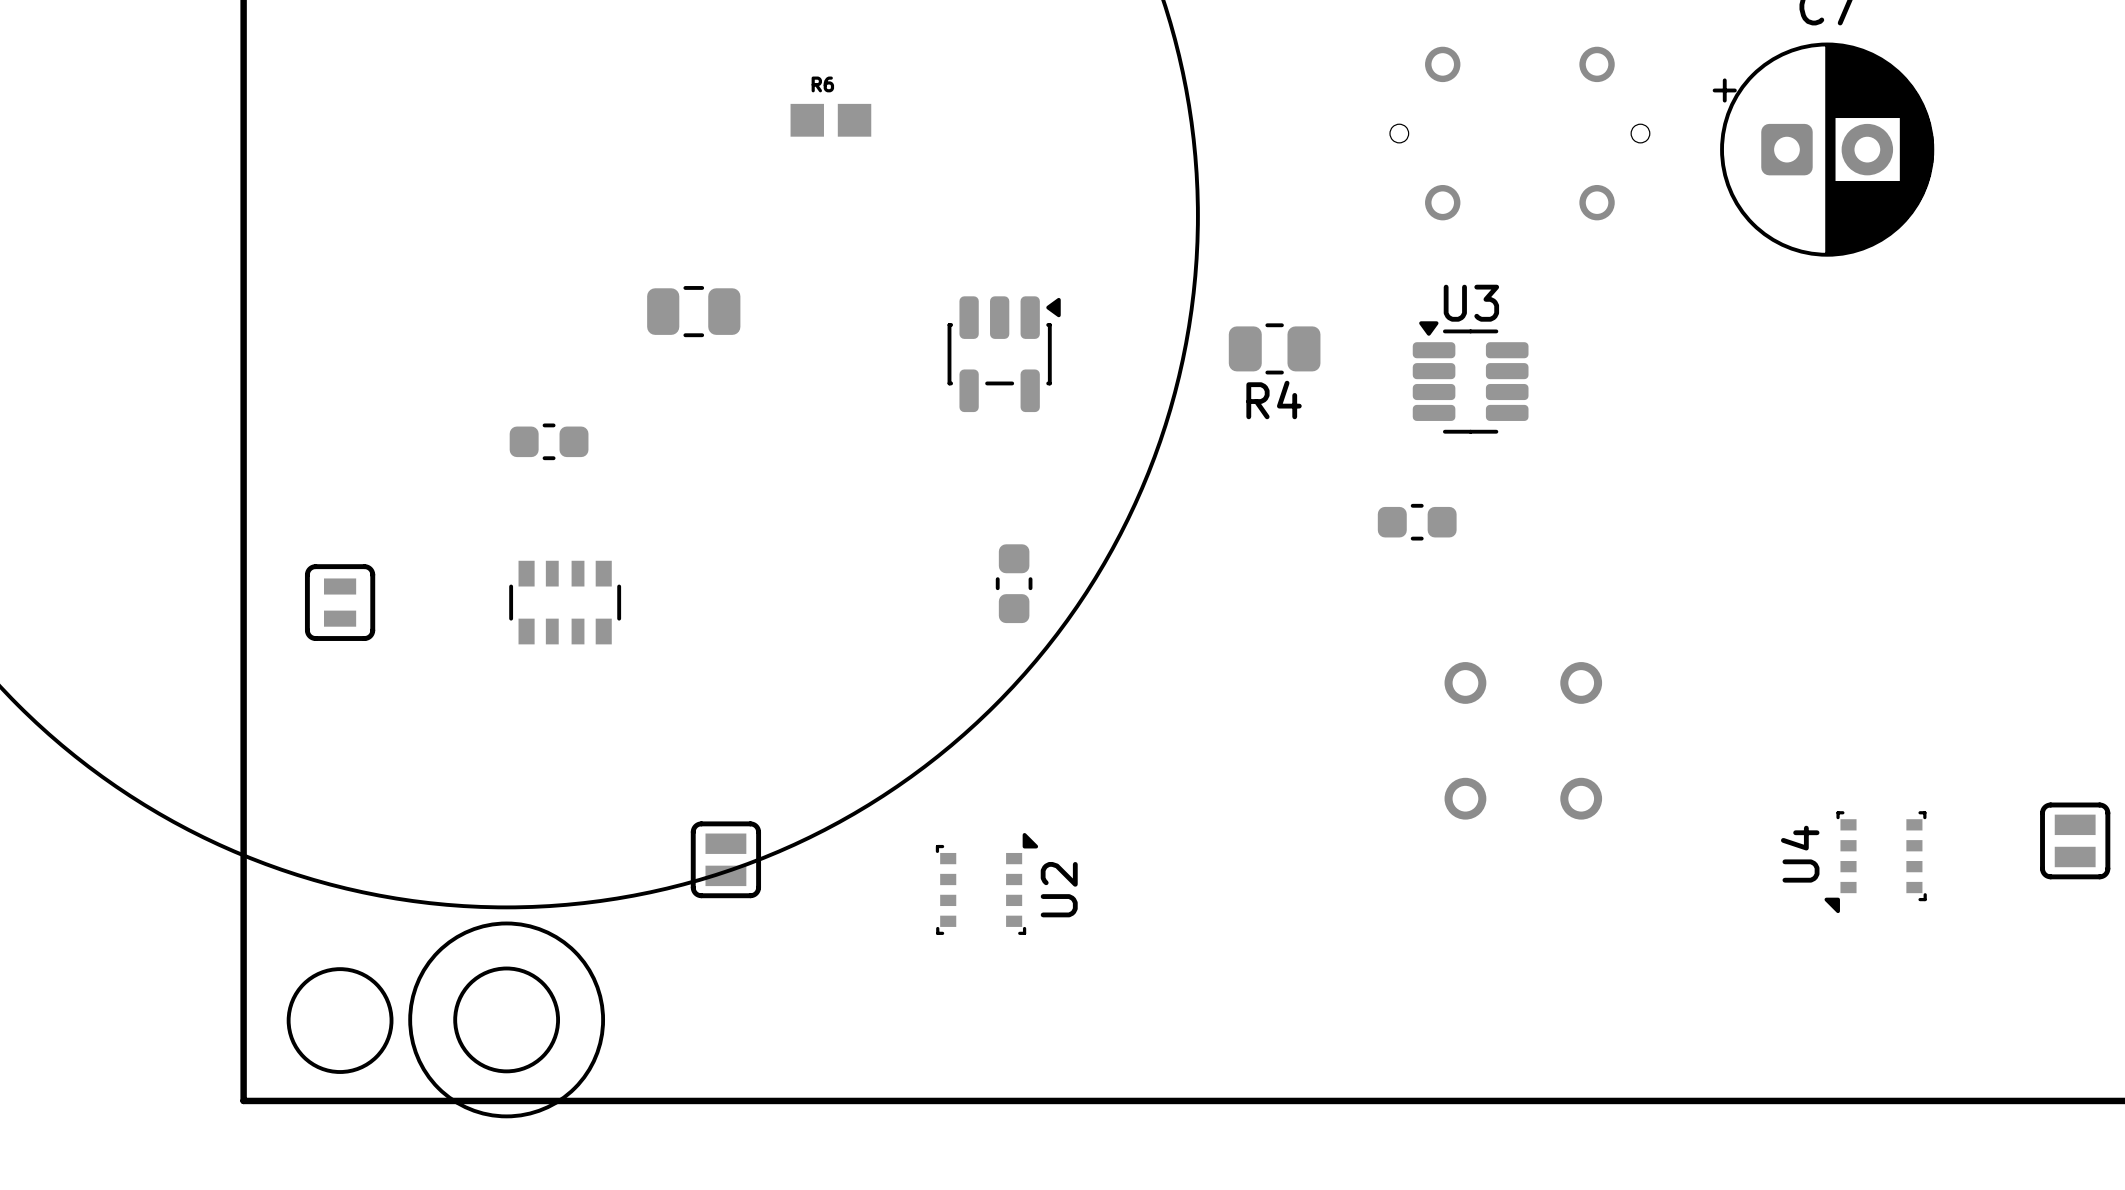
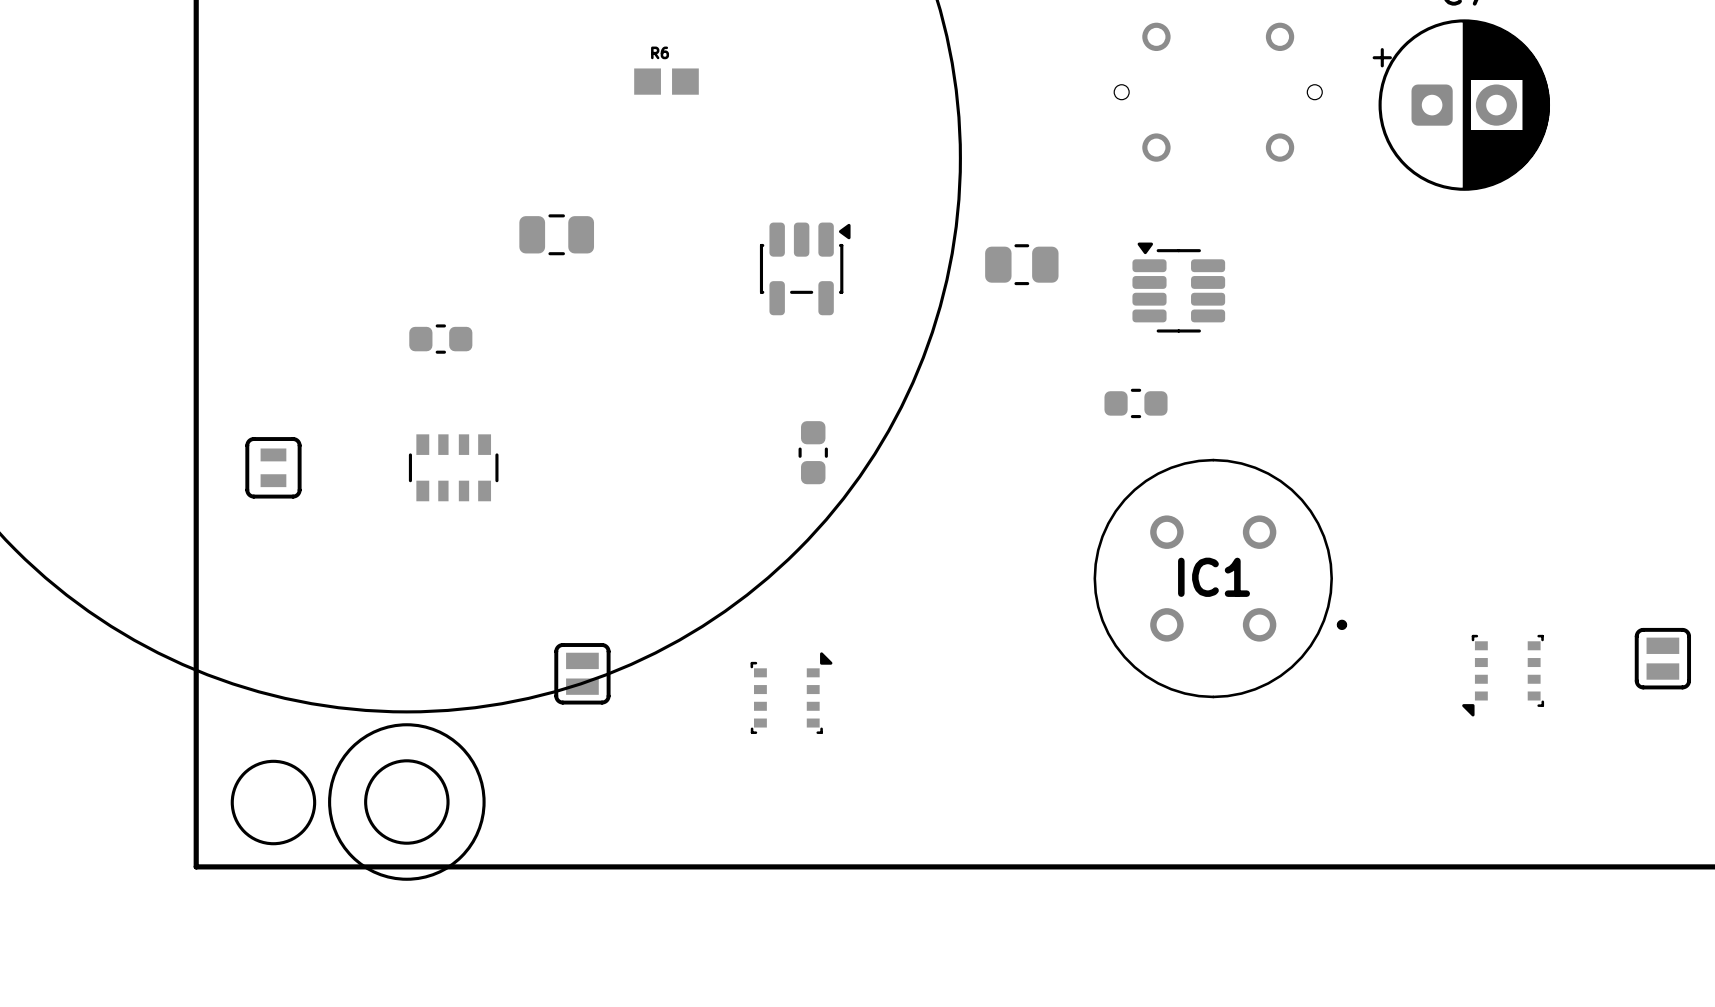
U3 name: U3 (1471, 303) -> none
R4 name: R4 (1274, 399) -> none
IC1 side: bottom (1523, 740) -> top (1220, 578)
U4 name: U4 (1800, 854) -> none
U2 name: U2 (1059, 889) -> none

